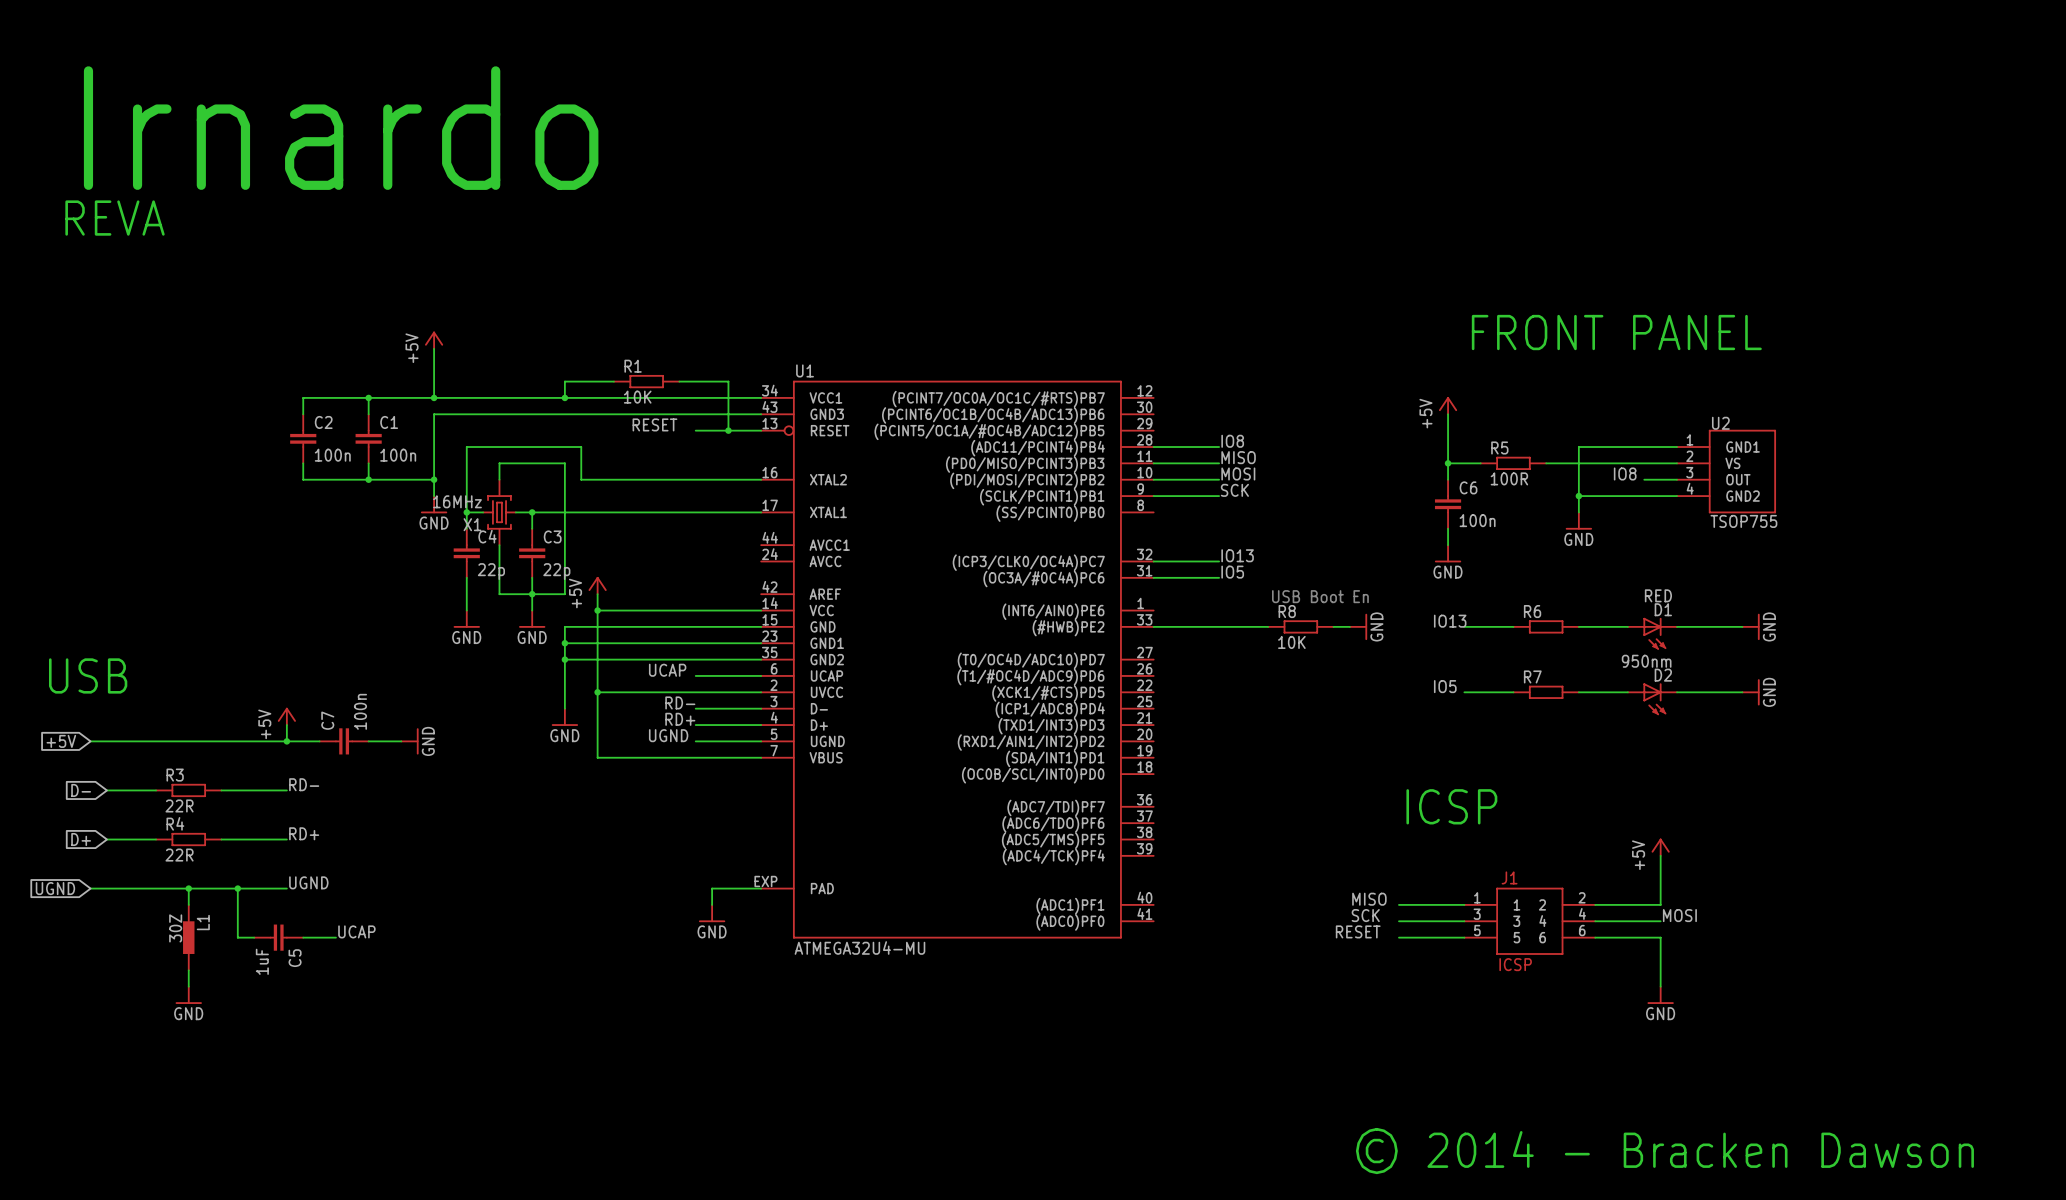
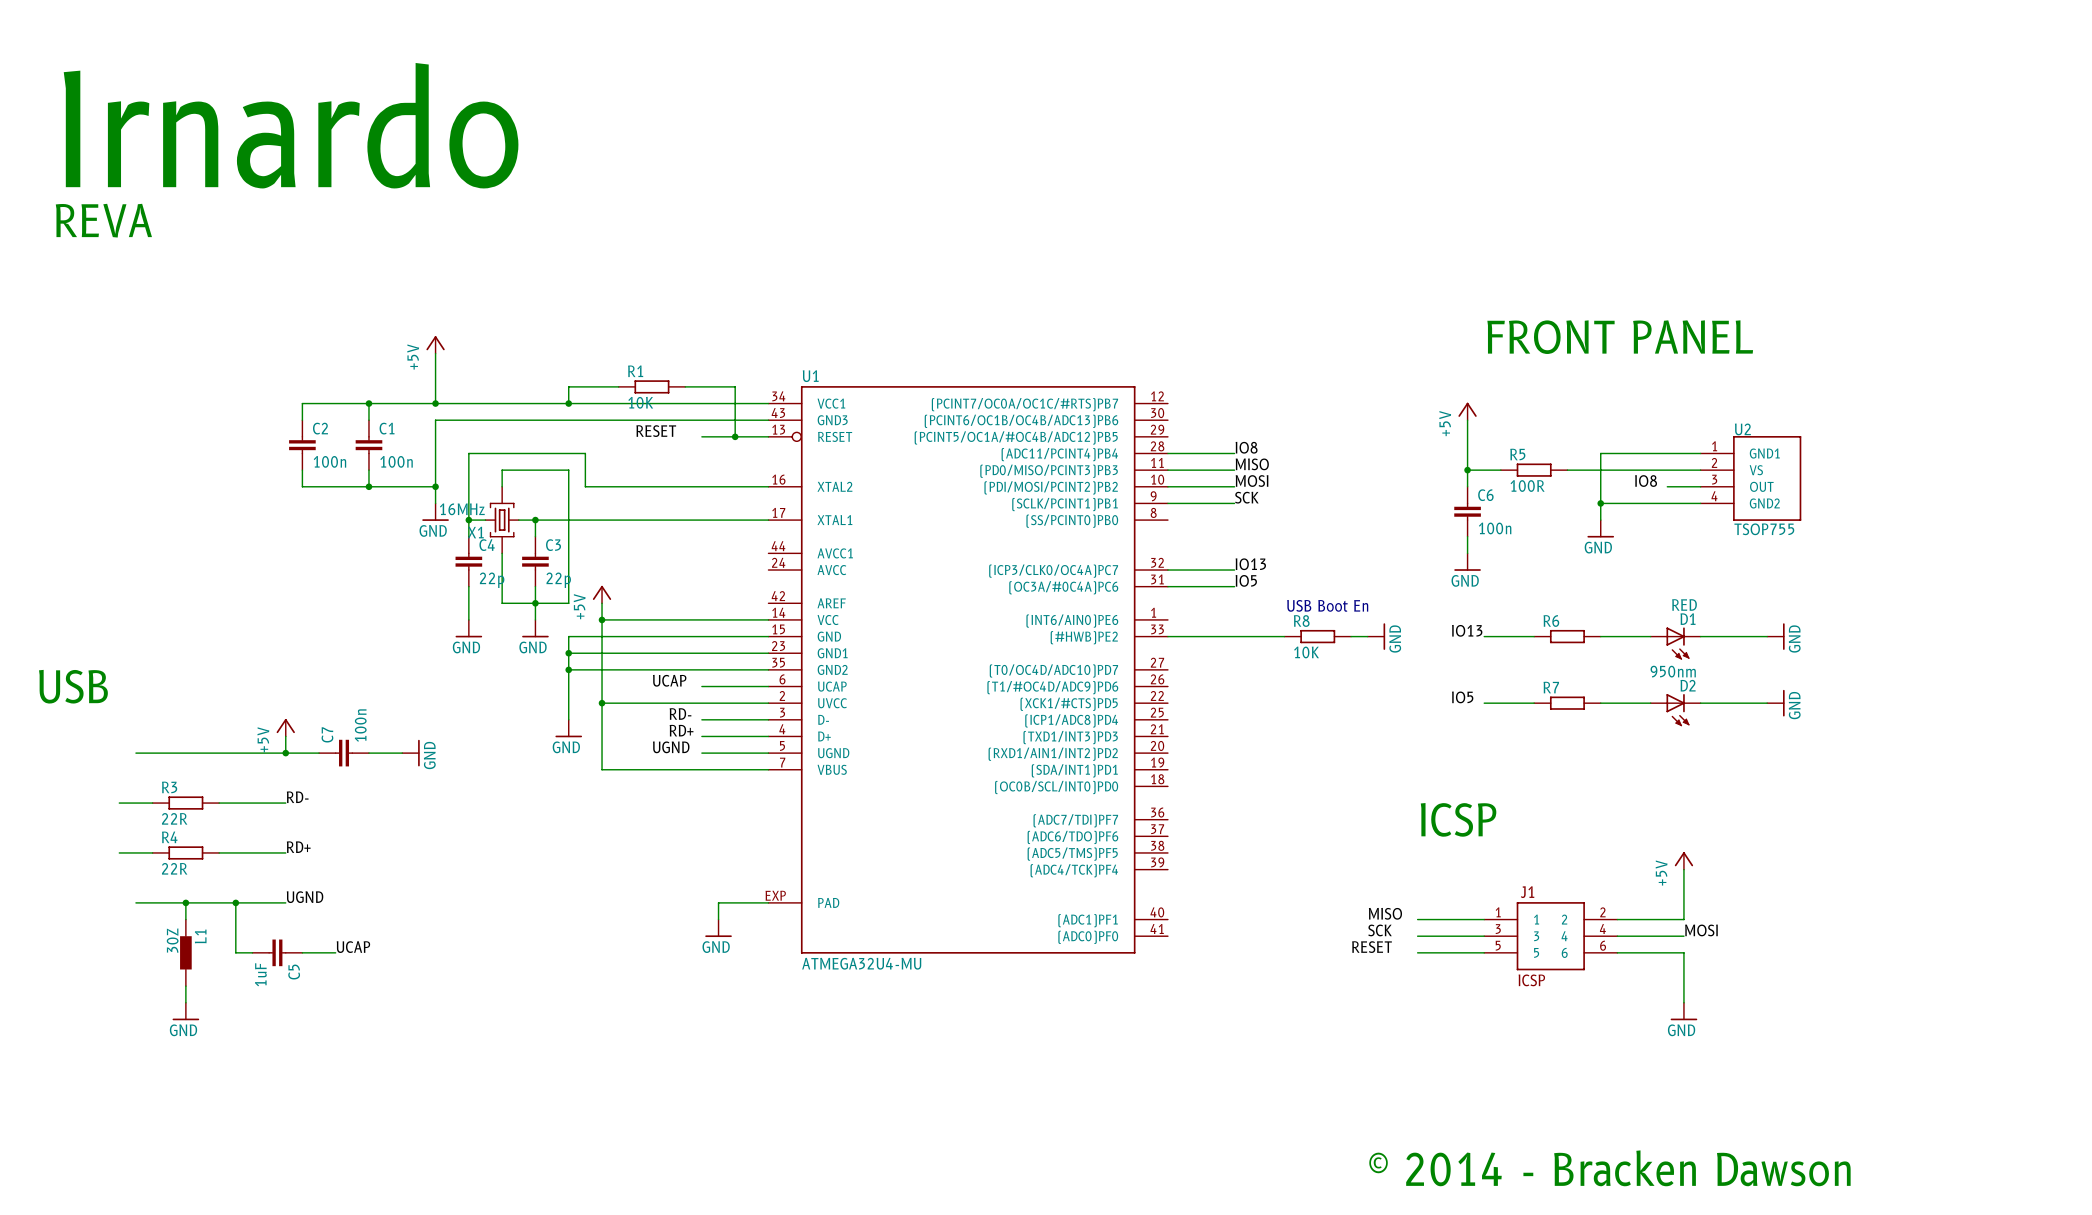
global label: +5V (61, 741) -> none
wire: (90, 741) (139, 741) -> none
global label: D- (81, 790) -> none
wire: (106, 790) (123, 790) -> none
global label: D+ (81, 839) -> none
wire: (106, 839) (123, 839) -> none
global label: UGND (55, 888) -> none
wire: (90, 888) (139, 888) -> none

